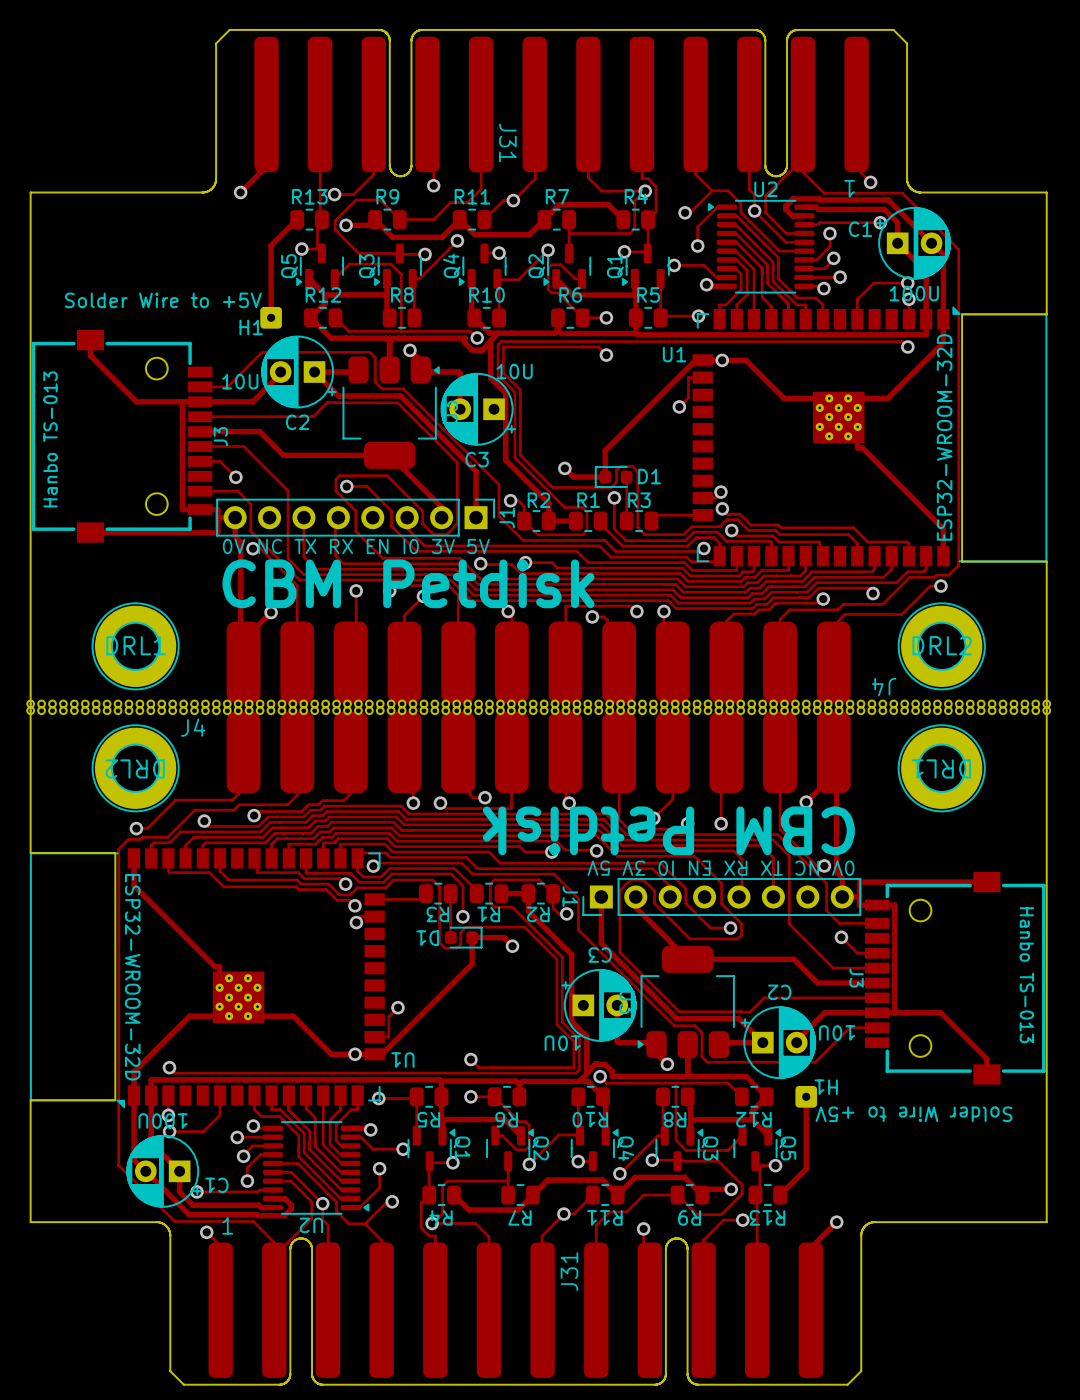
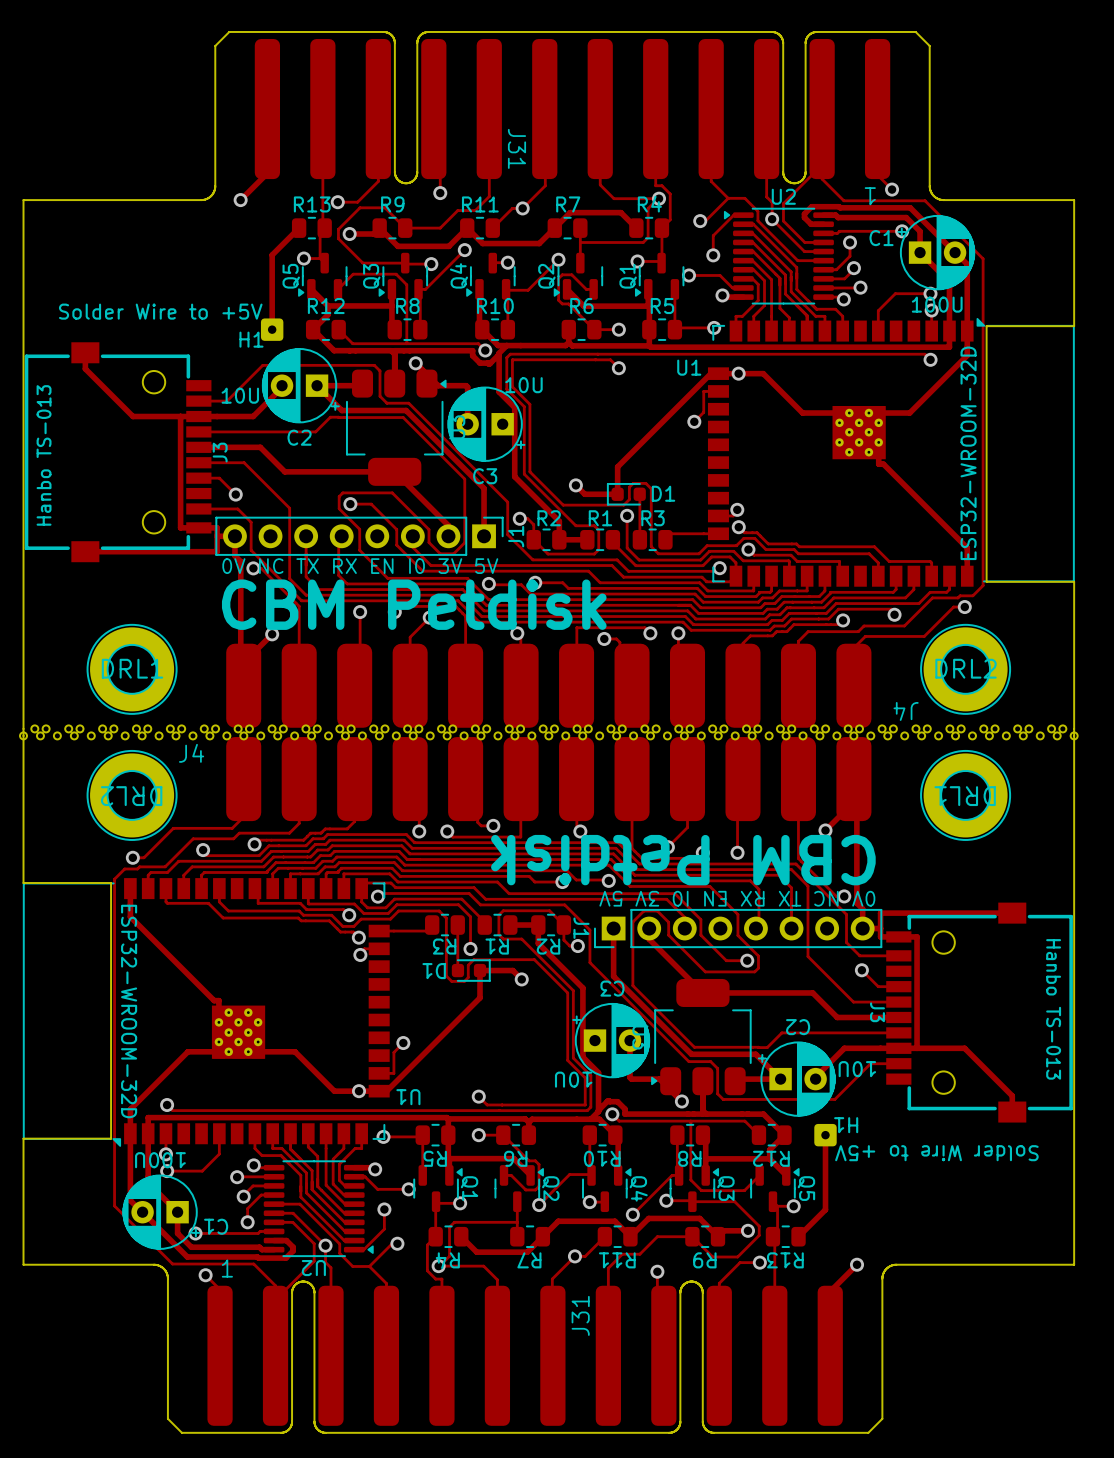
part: (30, 703) -> none
part: (63, 703) -> none
part: (96, 703) -> none
part: (128, 703) -> none
part: (161, 703) -> none
part: (194, 703) -> none
part: (227, 703) -> none
part: (260, 703) -> none
part: (292, 703) -> none
part: (325, 703) -> none
part: (358, 703) -> none
part: (391, 703) -> none
part: (423, 703) -> none
part: (456, 703) -> none
part: (489, 703) -> none
part: (522, 703) -> none
part: (555, 703) -> none
part: (587, 703) -> none
part: (620, 703) -> none
part: (653, 703) -> none
part: (686, 703) -> none
part: (718, 703) -> none
part: (751, 703) -> none
part: (784, 703) -> none
part: (817, 703) -> none
part: (850, 703) -> none
part: (882, 703) -> none
part: (915, 703) -> none
part: (948, 703) -> none
part: (981, 703) -> none
part: (1013, 703) -> none
part: (1046, 703) -> none
part: (41, 710) -> none
part: none -> (40, 735)
part: (52, 710) -> none
part: (74, 710) -> none
part: none -> (74, 735)
part: (85, 710) -> none
part: (107, 710) -> none
part: none -> (108, 735)
part: (118, 710) -> none
part: (139, 710) -> none
part: none -> (142, 735)
part: (150, 710) -> none
part: (172, 710) -> none
part: none -> (176, 735)
part: (183, 710) -> none
part: (205, 710) -> none
part: none -> (209, 735)
part: (216, 710) -> none
part: (238, 710) -> none
part: none -> (243, 735)
part: (249, 710) -> none
part: (271, 710) -> none
part: none -> (277, 735)
part: (281, 710) -> none
part: (303, 710) -> none
part: none -> (311, 735)
part: (314, 710) -> none
part: (336, 710) -> none
part: none -> (345, 735)
part: (347, 710) -> none
part: (369, 710) -> none
part: none -> (379, 735)
part: (380, 710) -> none
part: (402, 710) -> none
part: none -> (413, 735)
part: (413, 710) -> none
part: (434, 710) -> none
part: none -> (447, 735)
part: (445, 710) -> none
part: (467, 710) -> none
part: none -> (481, 735)
part: (478, 710) -> none
part: (500, 710) -> none
part: none -> (514, 735)
part: (511, 710) -> none
part: (533, 710) -> none
part: none -> (548, 735)
part: (544, 710) -> none
part: (565, 710) -> none
part: none -> (582, 735)
part: (576, 710) -> none
part: (598, 710) -> none
part: none -> (616, 735)
part: (609, 710) -> none
part: (631, 710) -> none
part: none -> (650, 735)
part: (642, 710) -> none
part: (664, 710) -> none
part: none -> (684, 735)
part: (675, 710) -> none
part: (697, 710) -> none
part: none -> (718, 735)
part: (708, 710) -> none
part: (729, 710) -> none
part: none -> (752, 735)
part: (740, 710) -> none
part: (762, 710) -> none
part: none -> (786, 735)
part: (773, 710) -> none
part: (795, 710) -> none
part: none -> (819, 735)
part: (806, 710) -> none
part: (828, 710) -> none
part: none -> (853, 735)
part: (839, 710) -> none
part: (860, 710) -> none
part: none -> (887, 735)
part: (871, 710) -> none
part: (893, 710) -> none
part: none -> (921, 735)
part: (904, 710) -> none
part: (926, 710) -> none
part: none -> (955, 735)
part: (937, 710) -> none
part: (959, 710) -> none
part: none -> (989, 735)
part: (970, 710) -> none
part: (992, 710) -> none
part: none -> (1023, 735)
part: (1003, 710) -> none
part: (1024, 710) -> none
part: none -> (1057, 735)
part: (1035, 710) -> none

